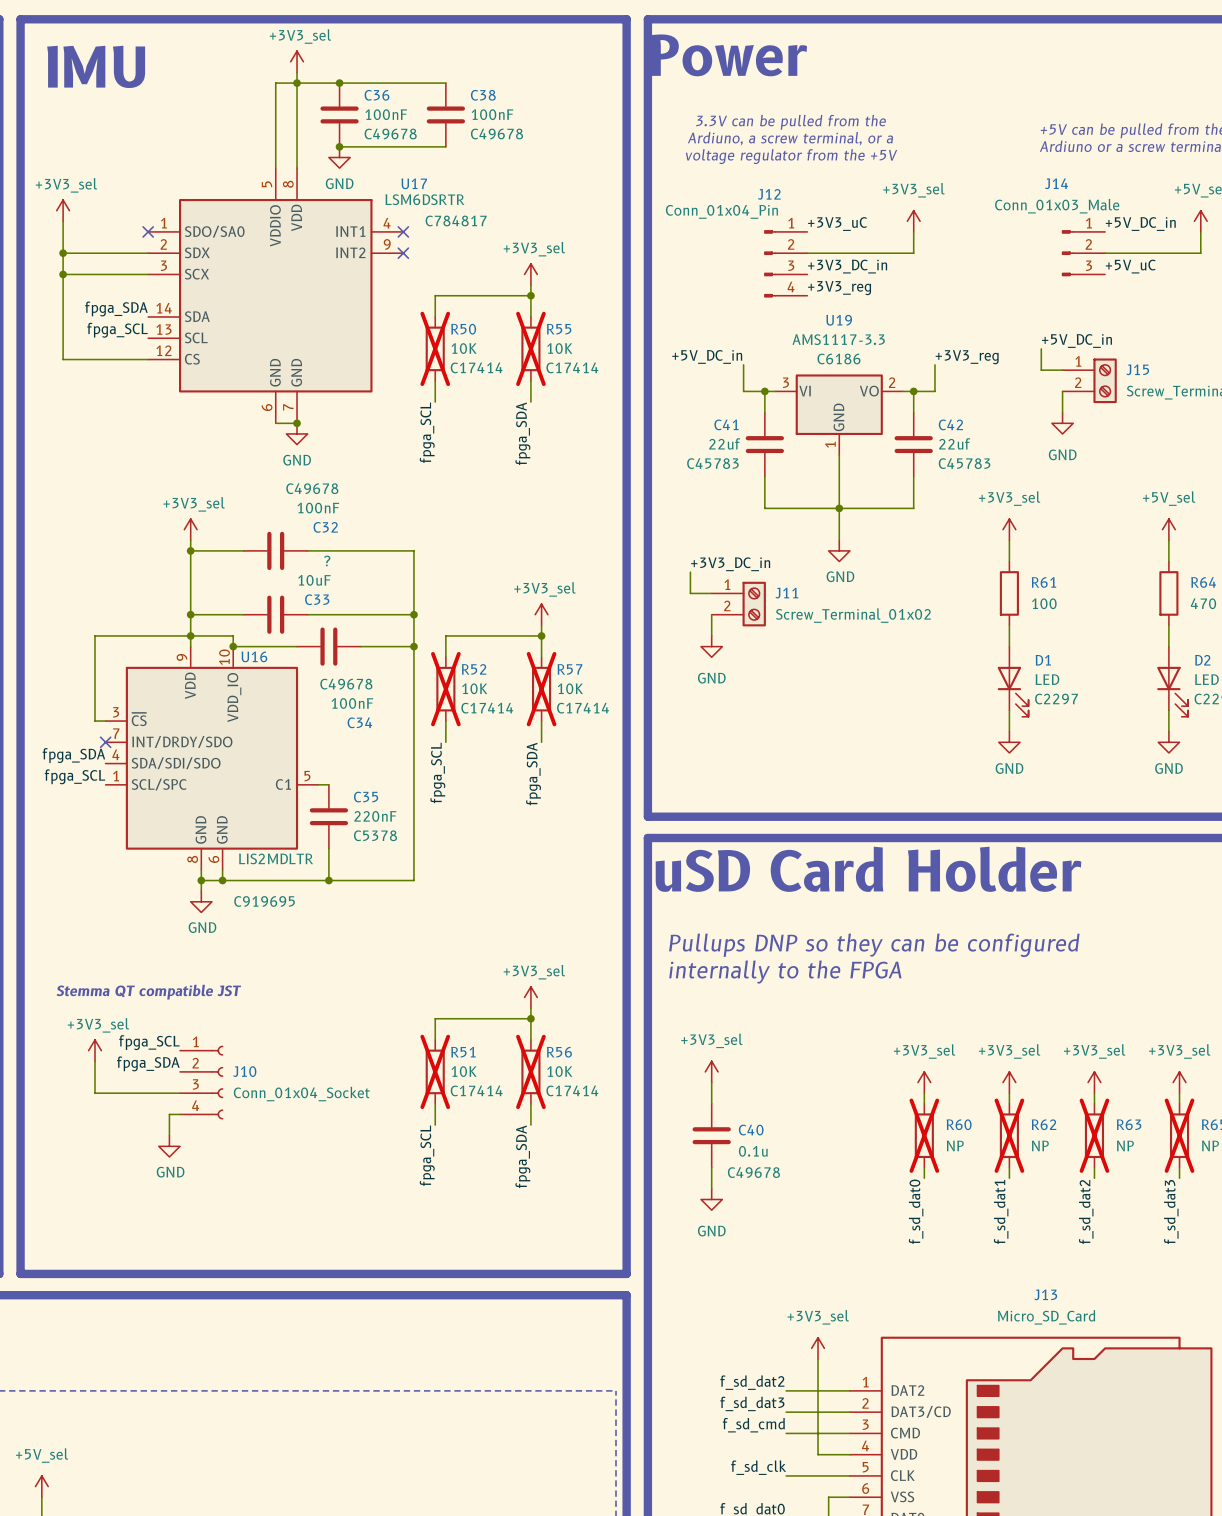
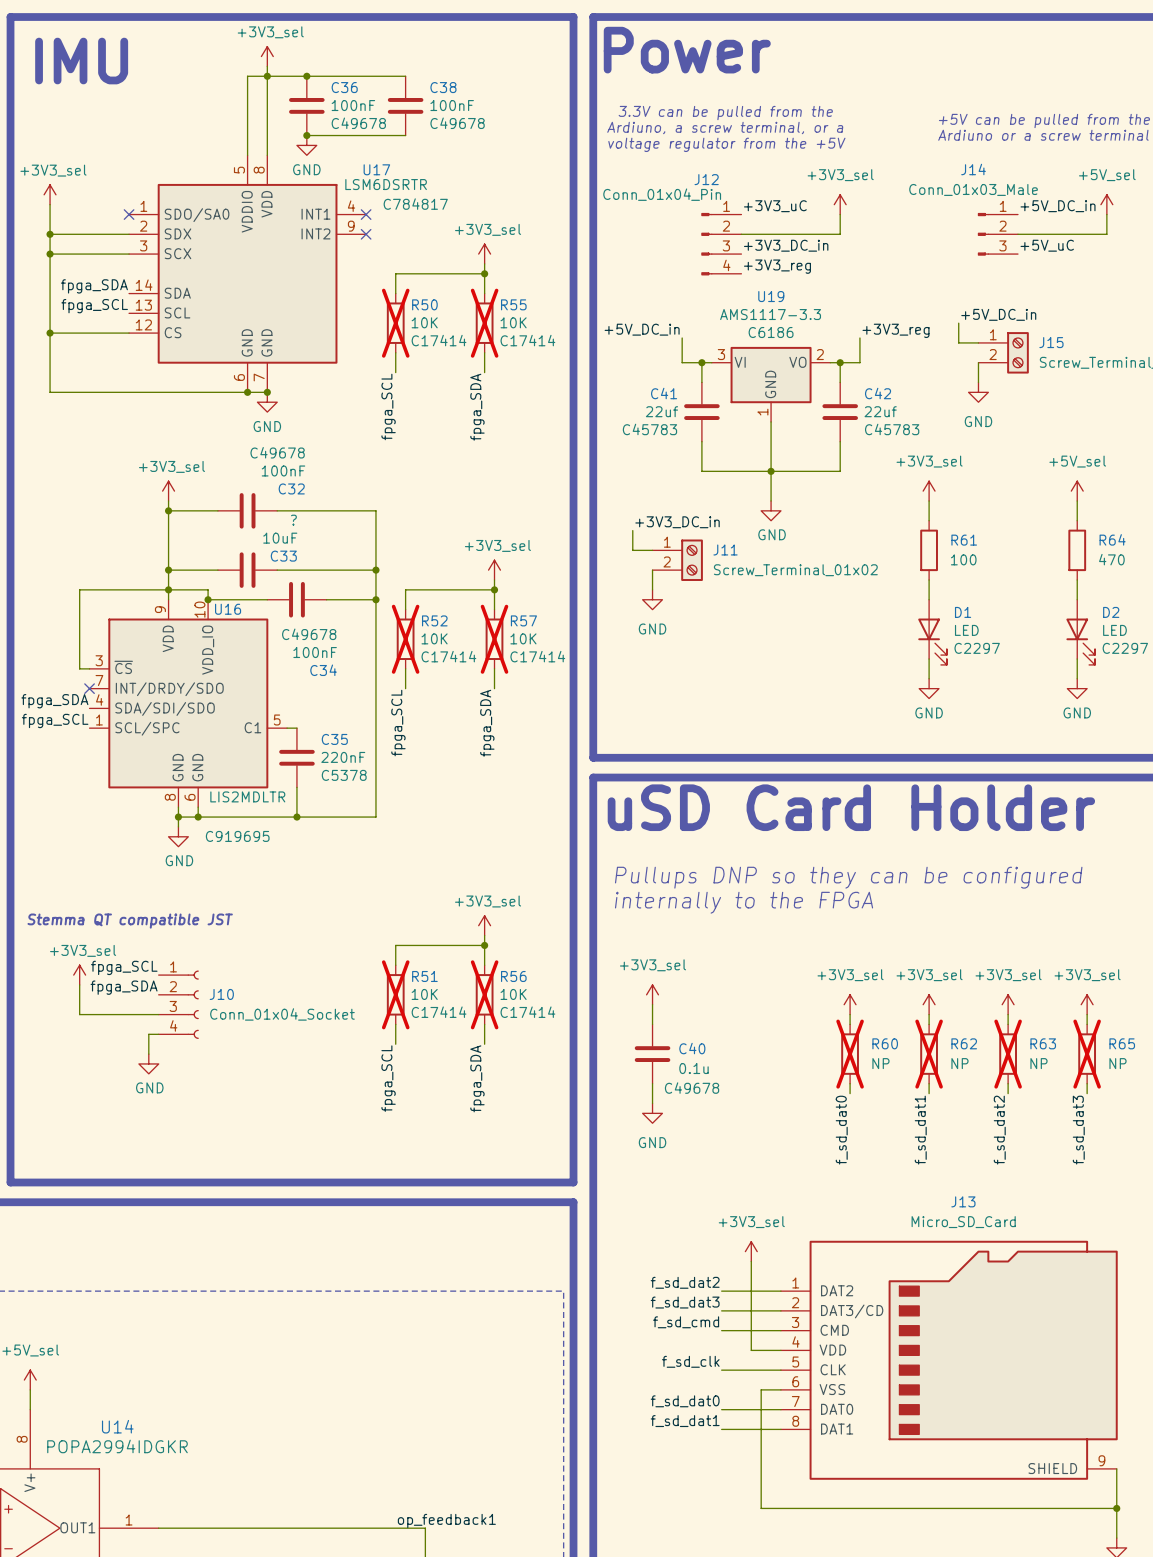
wire: none -> (50, 333) (50, 392) (247, 392)
junction: none -> (50, 333)
junction: none -> (247, 392)

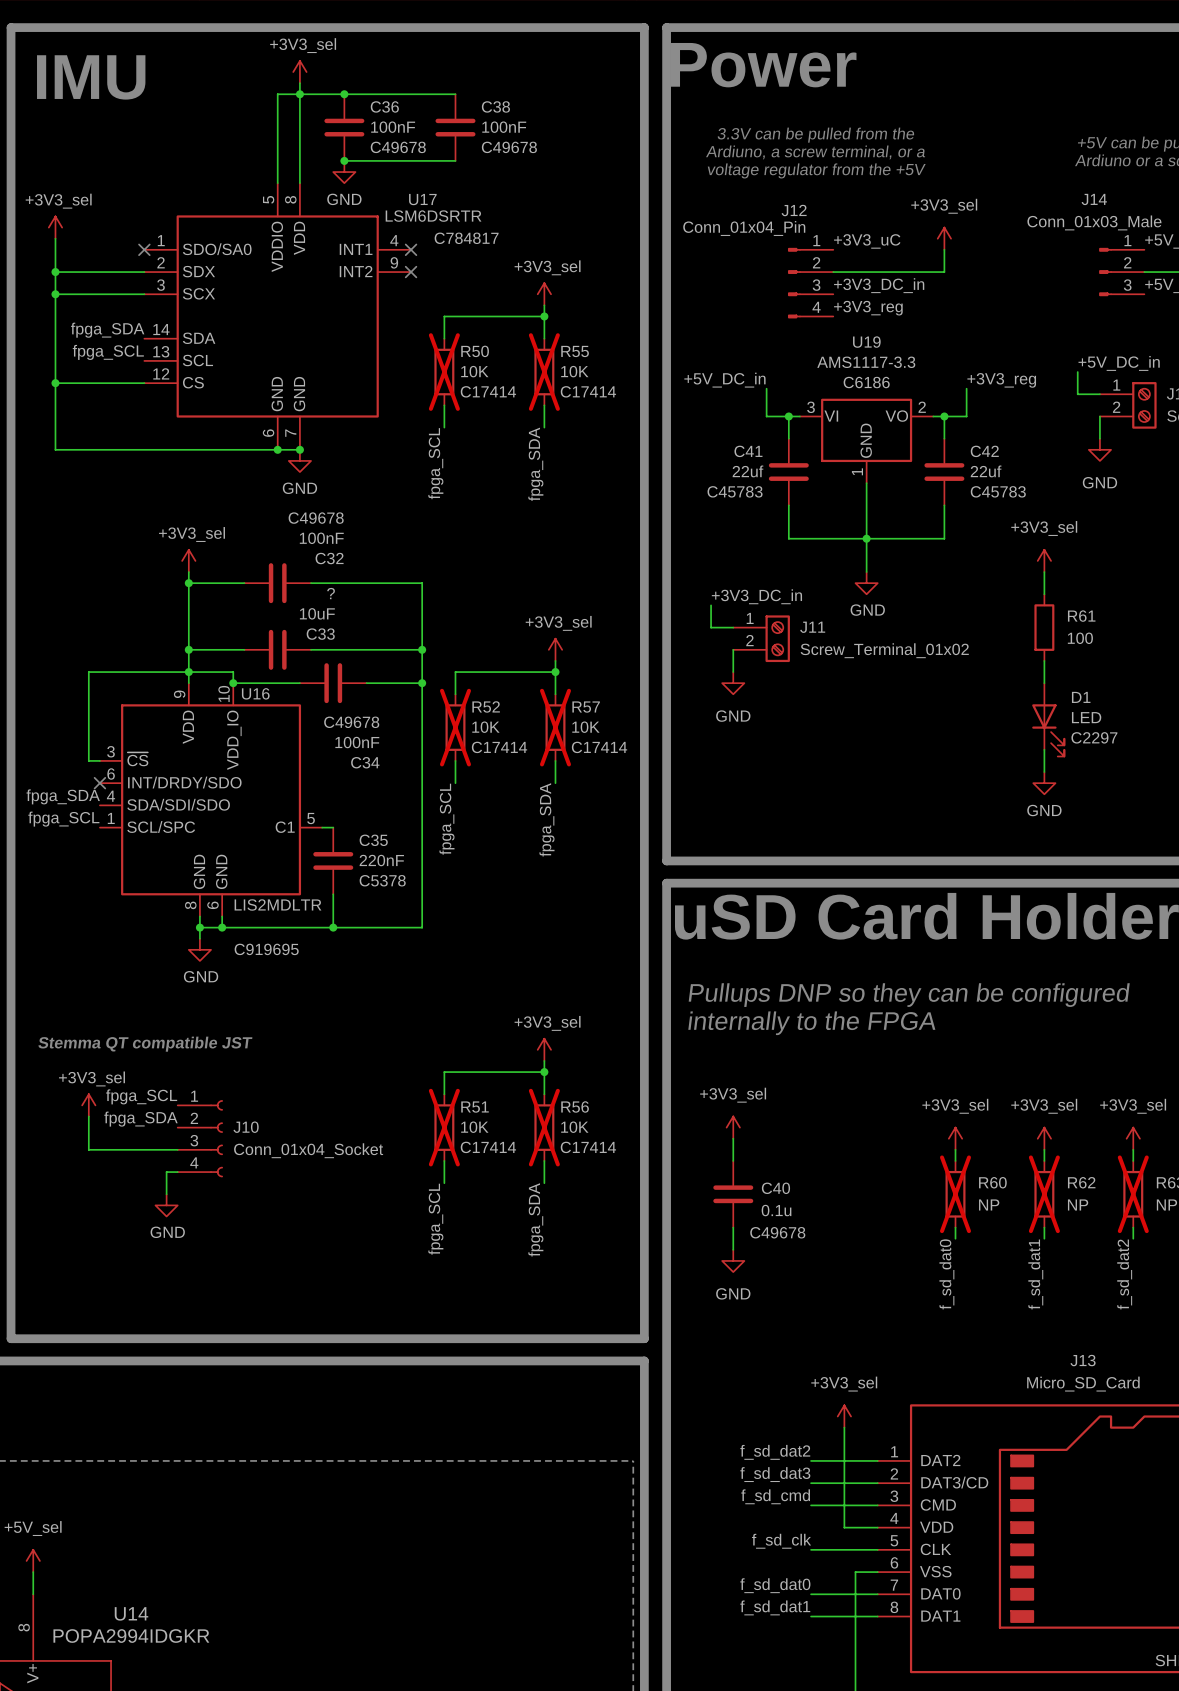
U16 pin number: 7 (99, 680) -> 6 (111, 773)

